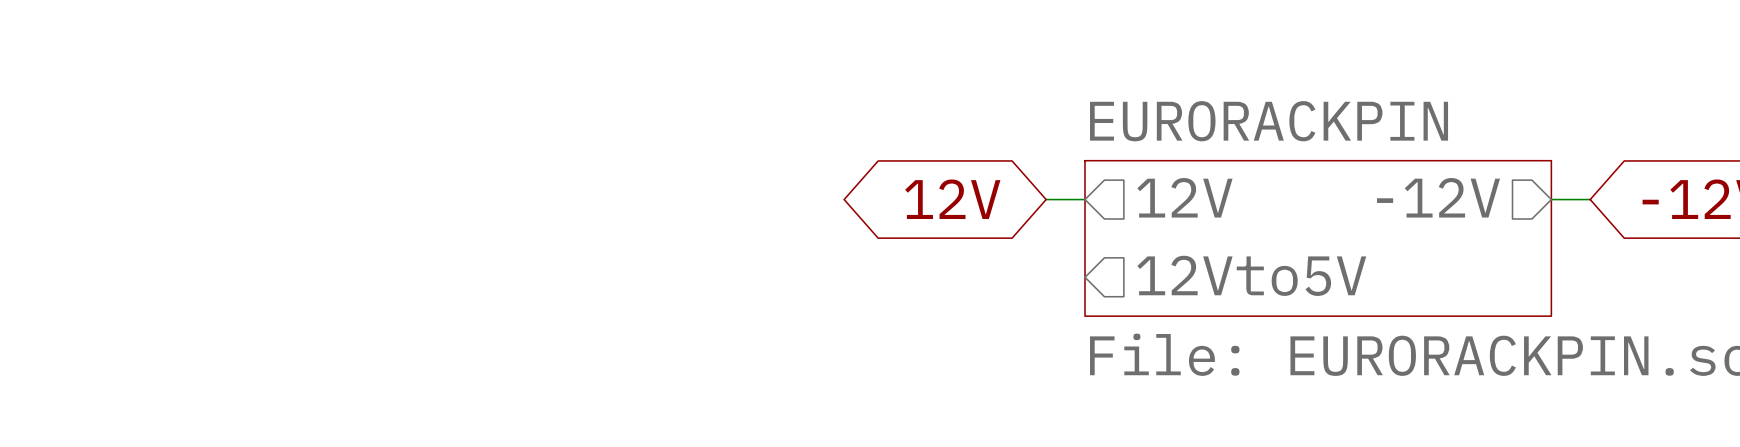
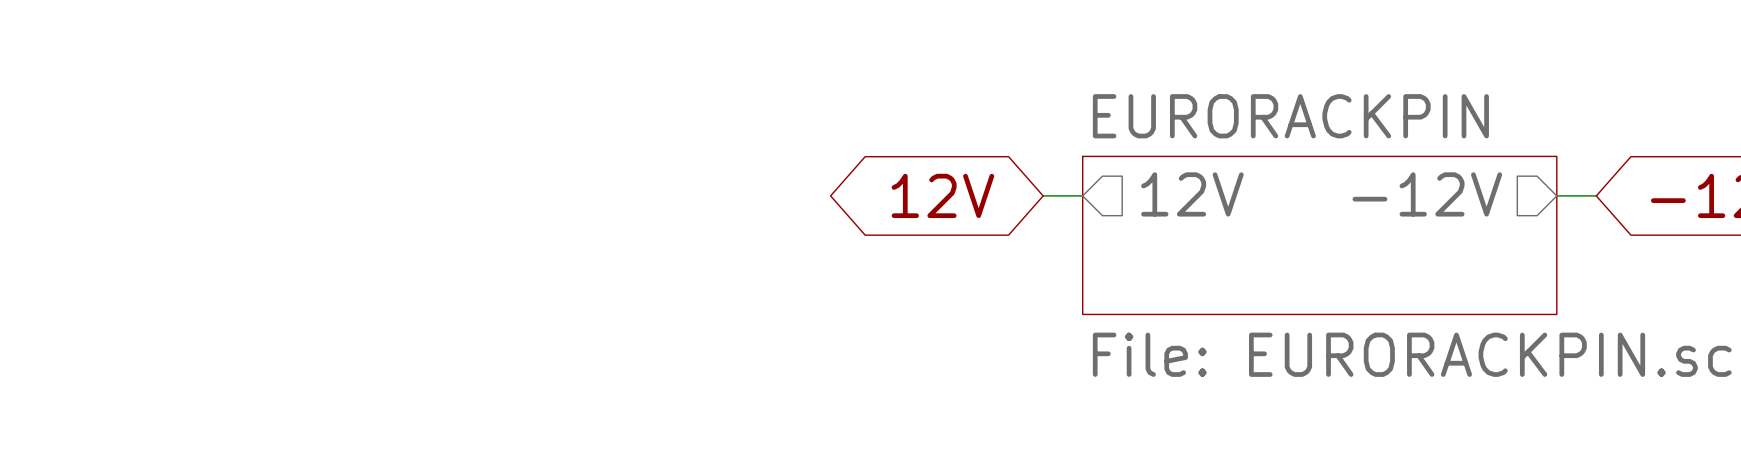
sheet pin: 12Vto5V (1251, 275) -> none

